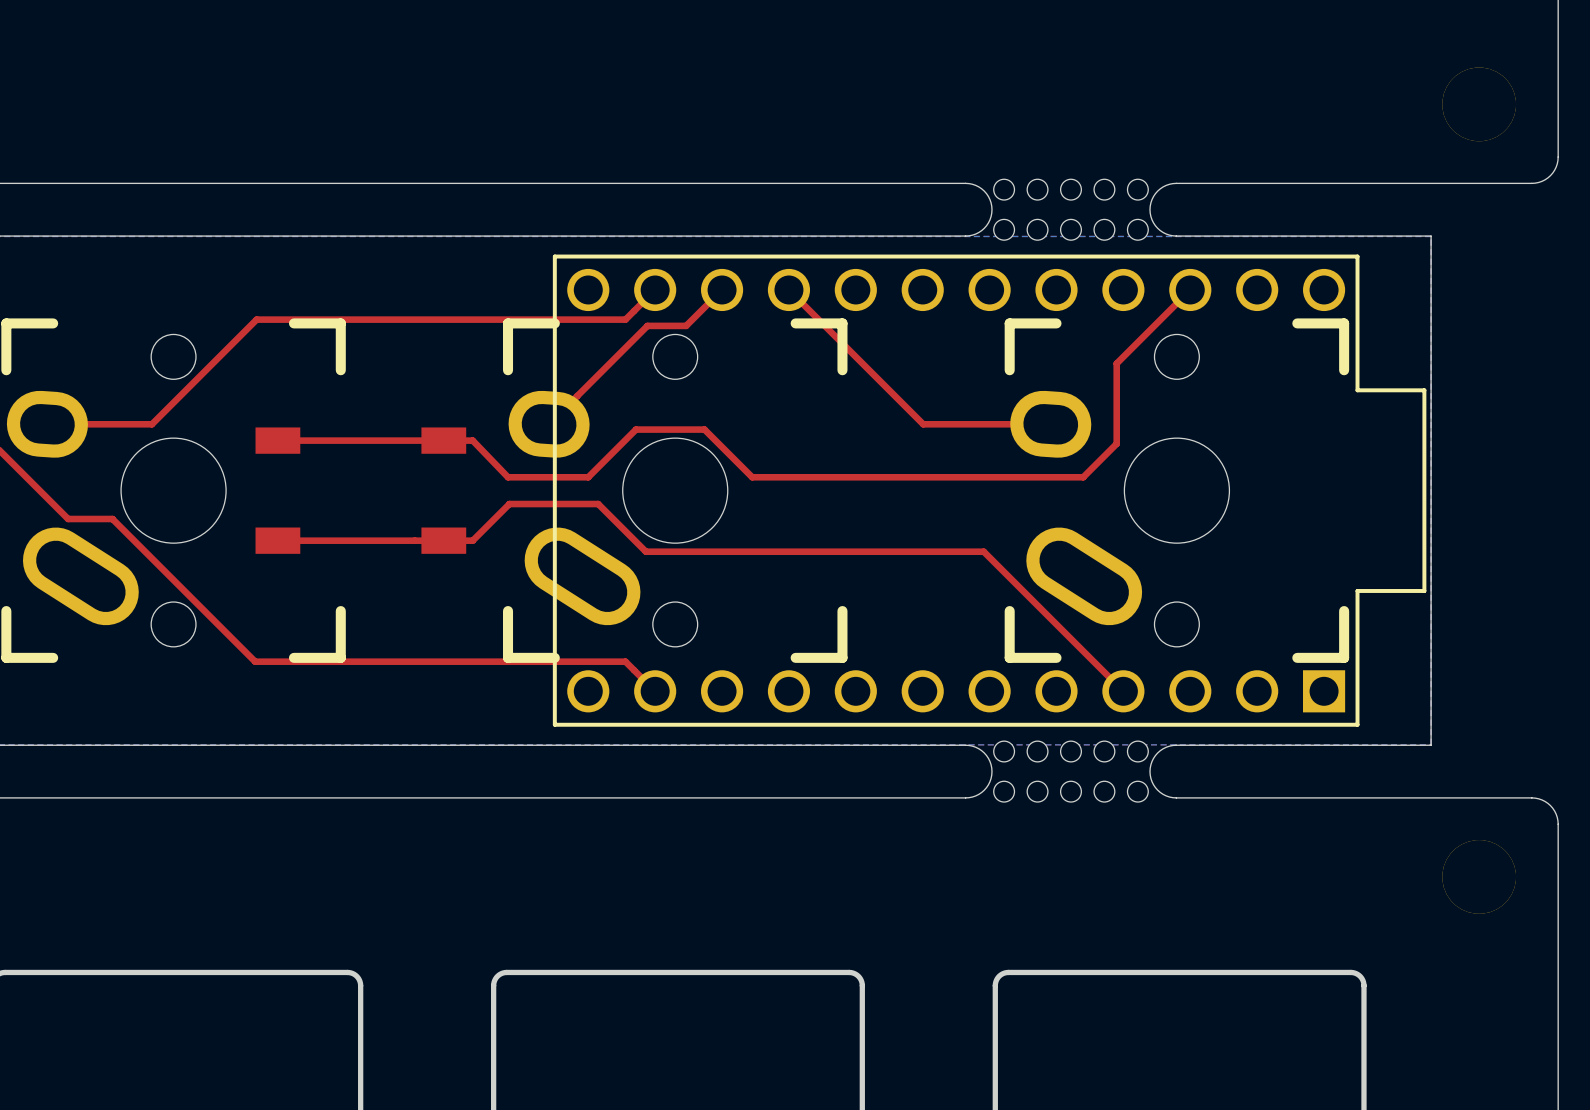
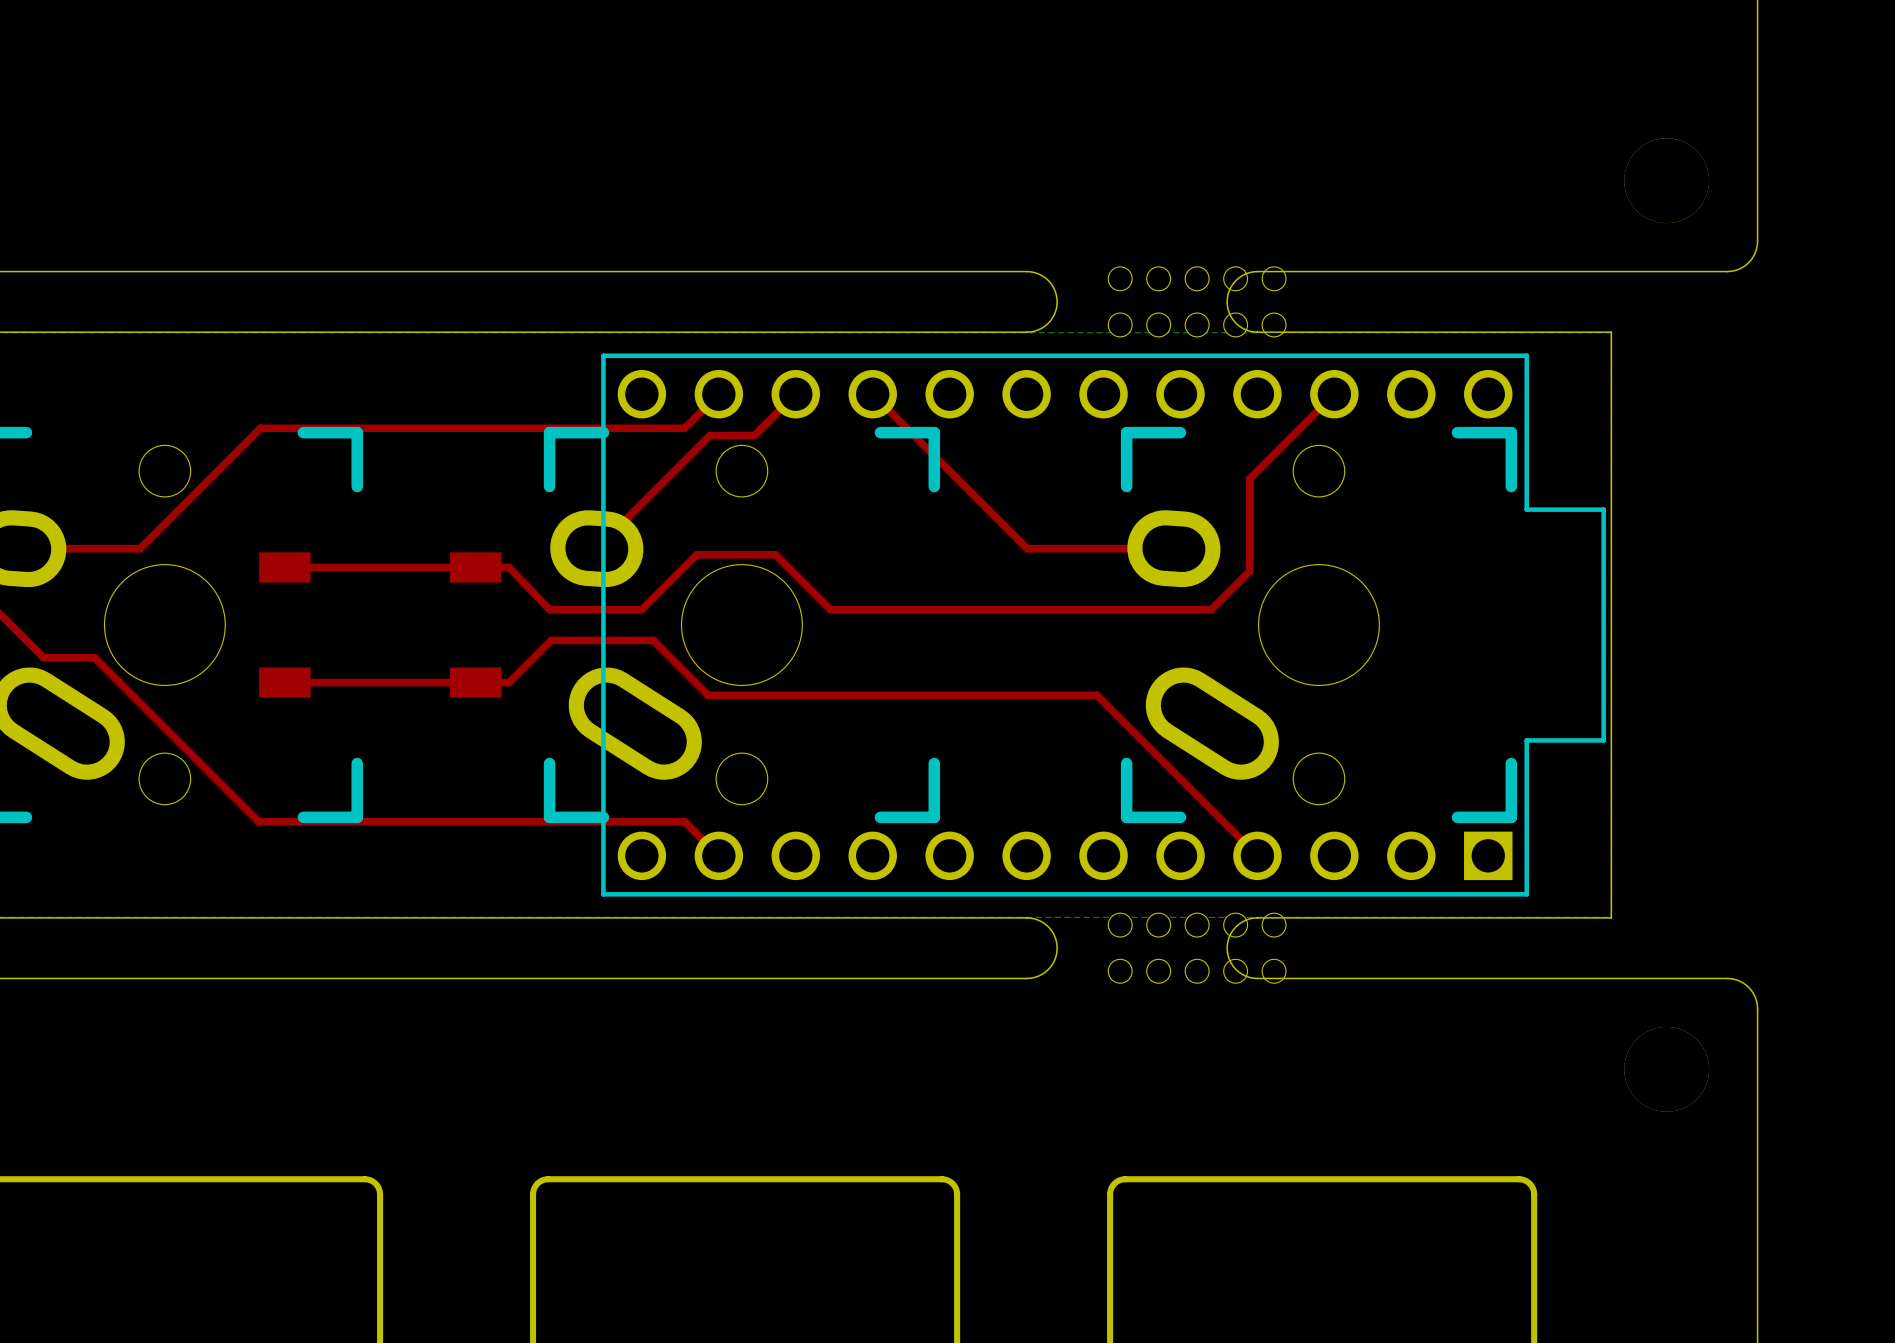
board edge: (922, 183) (965, 183) (975, 185) (986, 193) (991, 209) (986, 225) (975, 234) (965, 236) (922, 236) -> (1026, 271) (1038, 273) (1048, 280) (1054, 290) (1057, 301) (1054, 313) (1048, 323) (1038, 329) (1026, 332)
board edge: (1176, 183) (1166, 185) (1157, 191) (1152, 199) (1149, 209) (1152, 219) (1157, 228) (1166, 234) (1176, 236) -> (1318, 271) (1249, 272) (1238, 277) (1233, 283) (1229, 290) (1227, 301) (1229, 313) (1233, 320) (1238, 325) (1249, 331) (1318, 332)
board edge: (922, 745) (965, 745) (975, 747) (986, 755) (991, 771) (986, 787) (975, 795) (965, 797) (922, 797) -> (1026, 917) (1038, 920) (1048, 926) (1054, 936) (1057, 948) (1054, 959) (1048, 969) (1038, 976) (1026, 978)
board edge: (1176, 745) (1166, 747) (1157, 752) (1152, 761) (1149, 771) (1152, 781) (1157, 790) (1166, 795) (1176, 797) -> (1318, 917) (1249, 918) (1238, 924) (1233, 929) (1229, 936) (1227, 948) (1229, 959) (1233, 966) (1238, 972) (1249, 977) (1318, 978)

